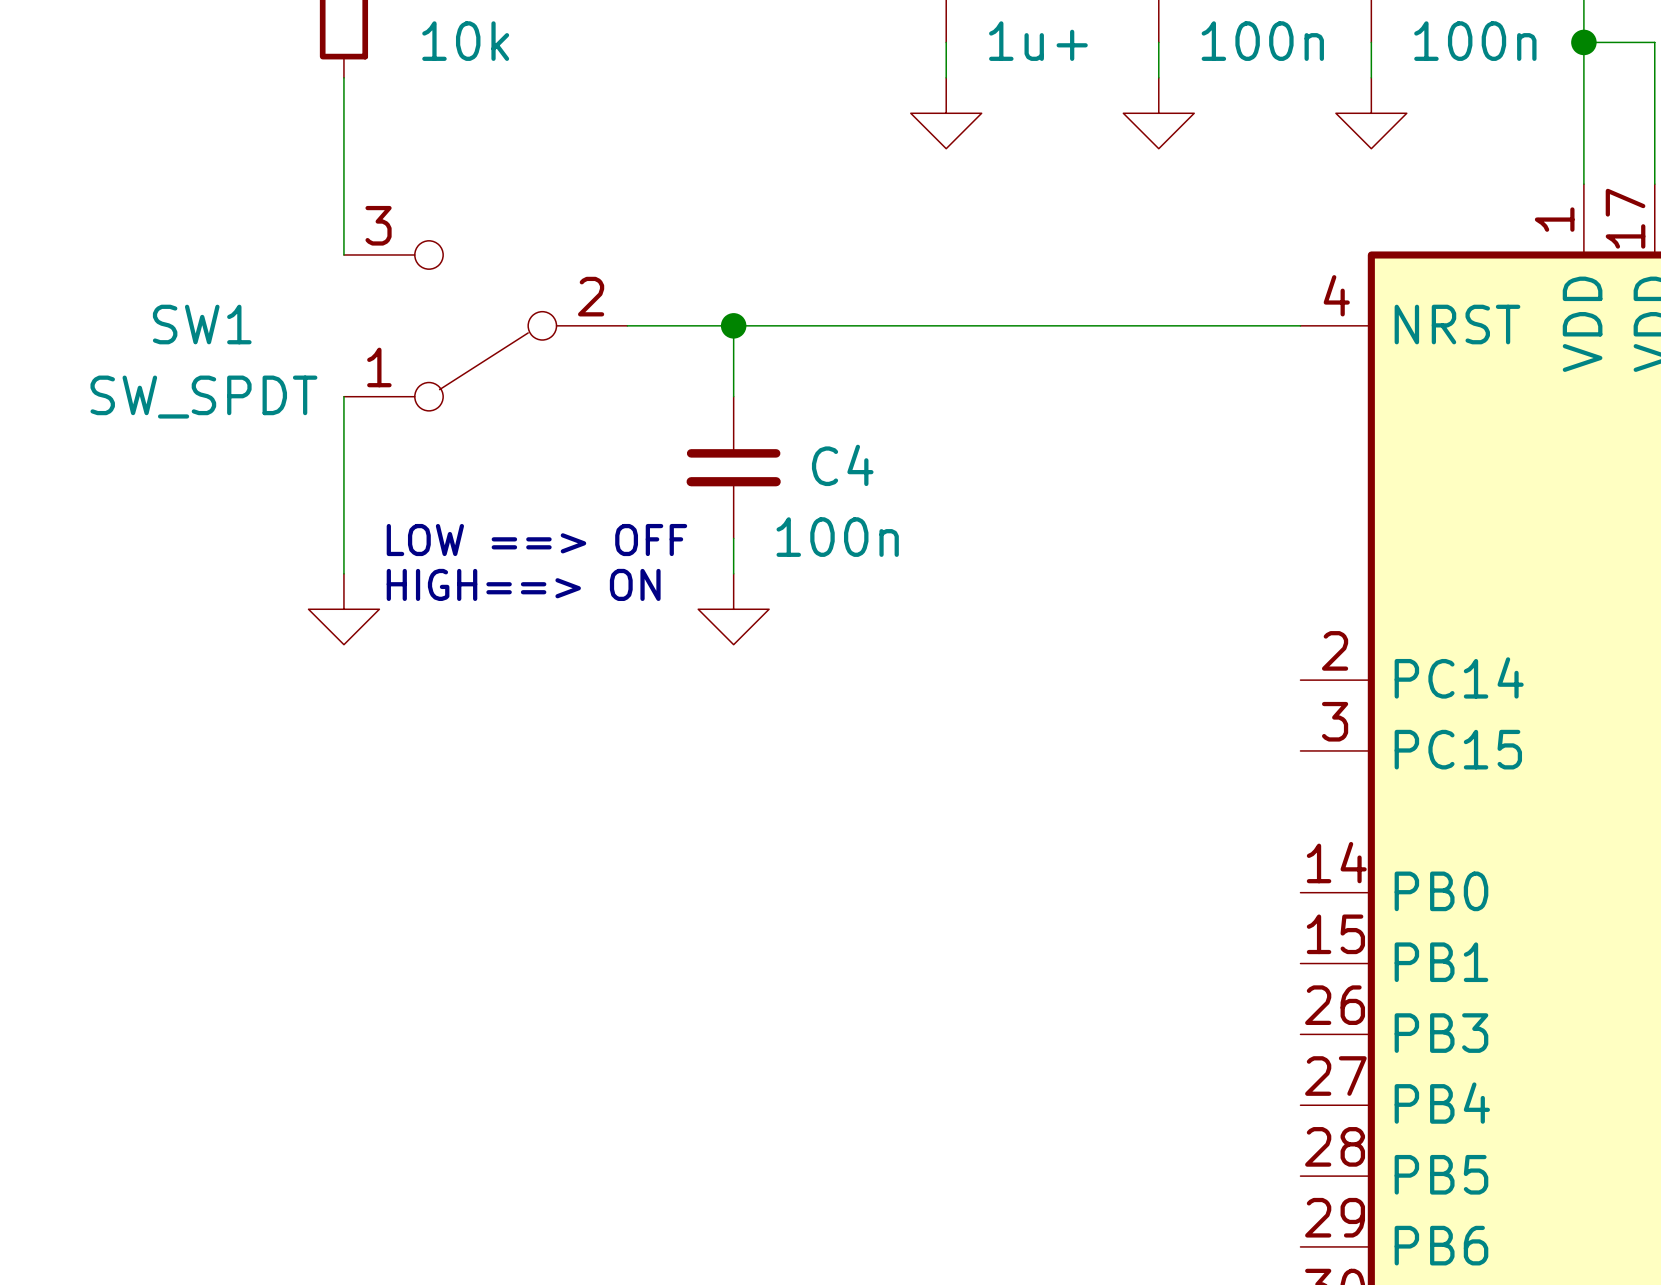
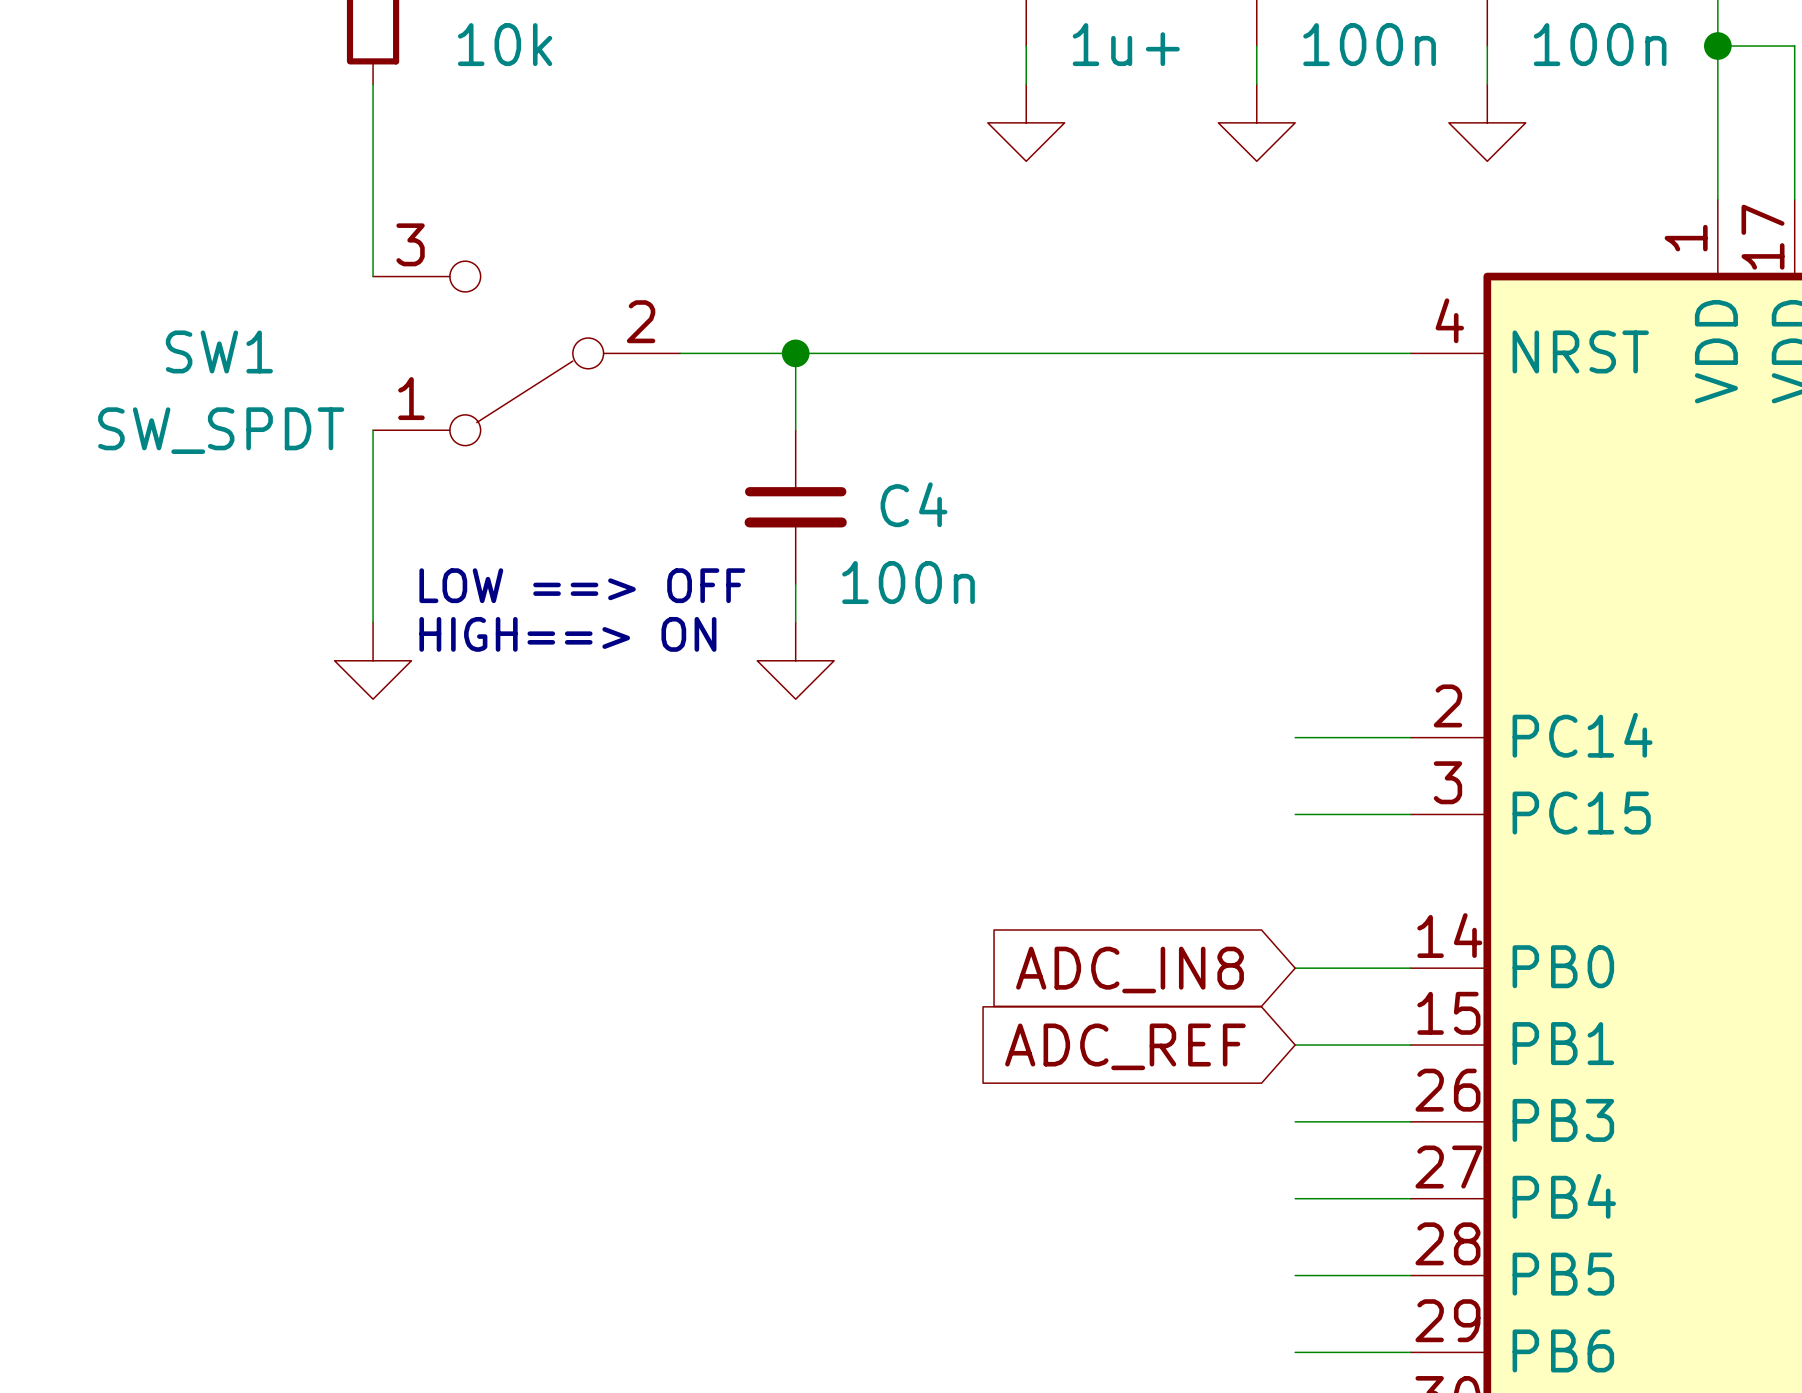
wire: none -> (1295, 737) (1410, 737)
wire: none -> (1295, 814) (1410, 814)
wire: none -> (1295, 968) (1410, 968)
global label: none -> ADC_IN8 (1130, 969)
wire: none -> (1295, 1045) (1410, 1045)
global label: none -> ADC_REF (1125, 1046)
wire: none -> (1295, 1121) (1410, 1121)
wire: none -> (1295, 1198) (1410, 1198)
wire: none -> (1295, 1275) (1410, 1275)
wire: none -> (1295, 1352) (1410, 1352)

